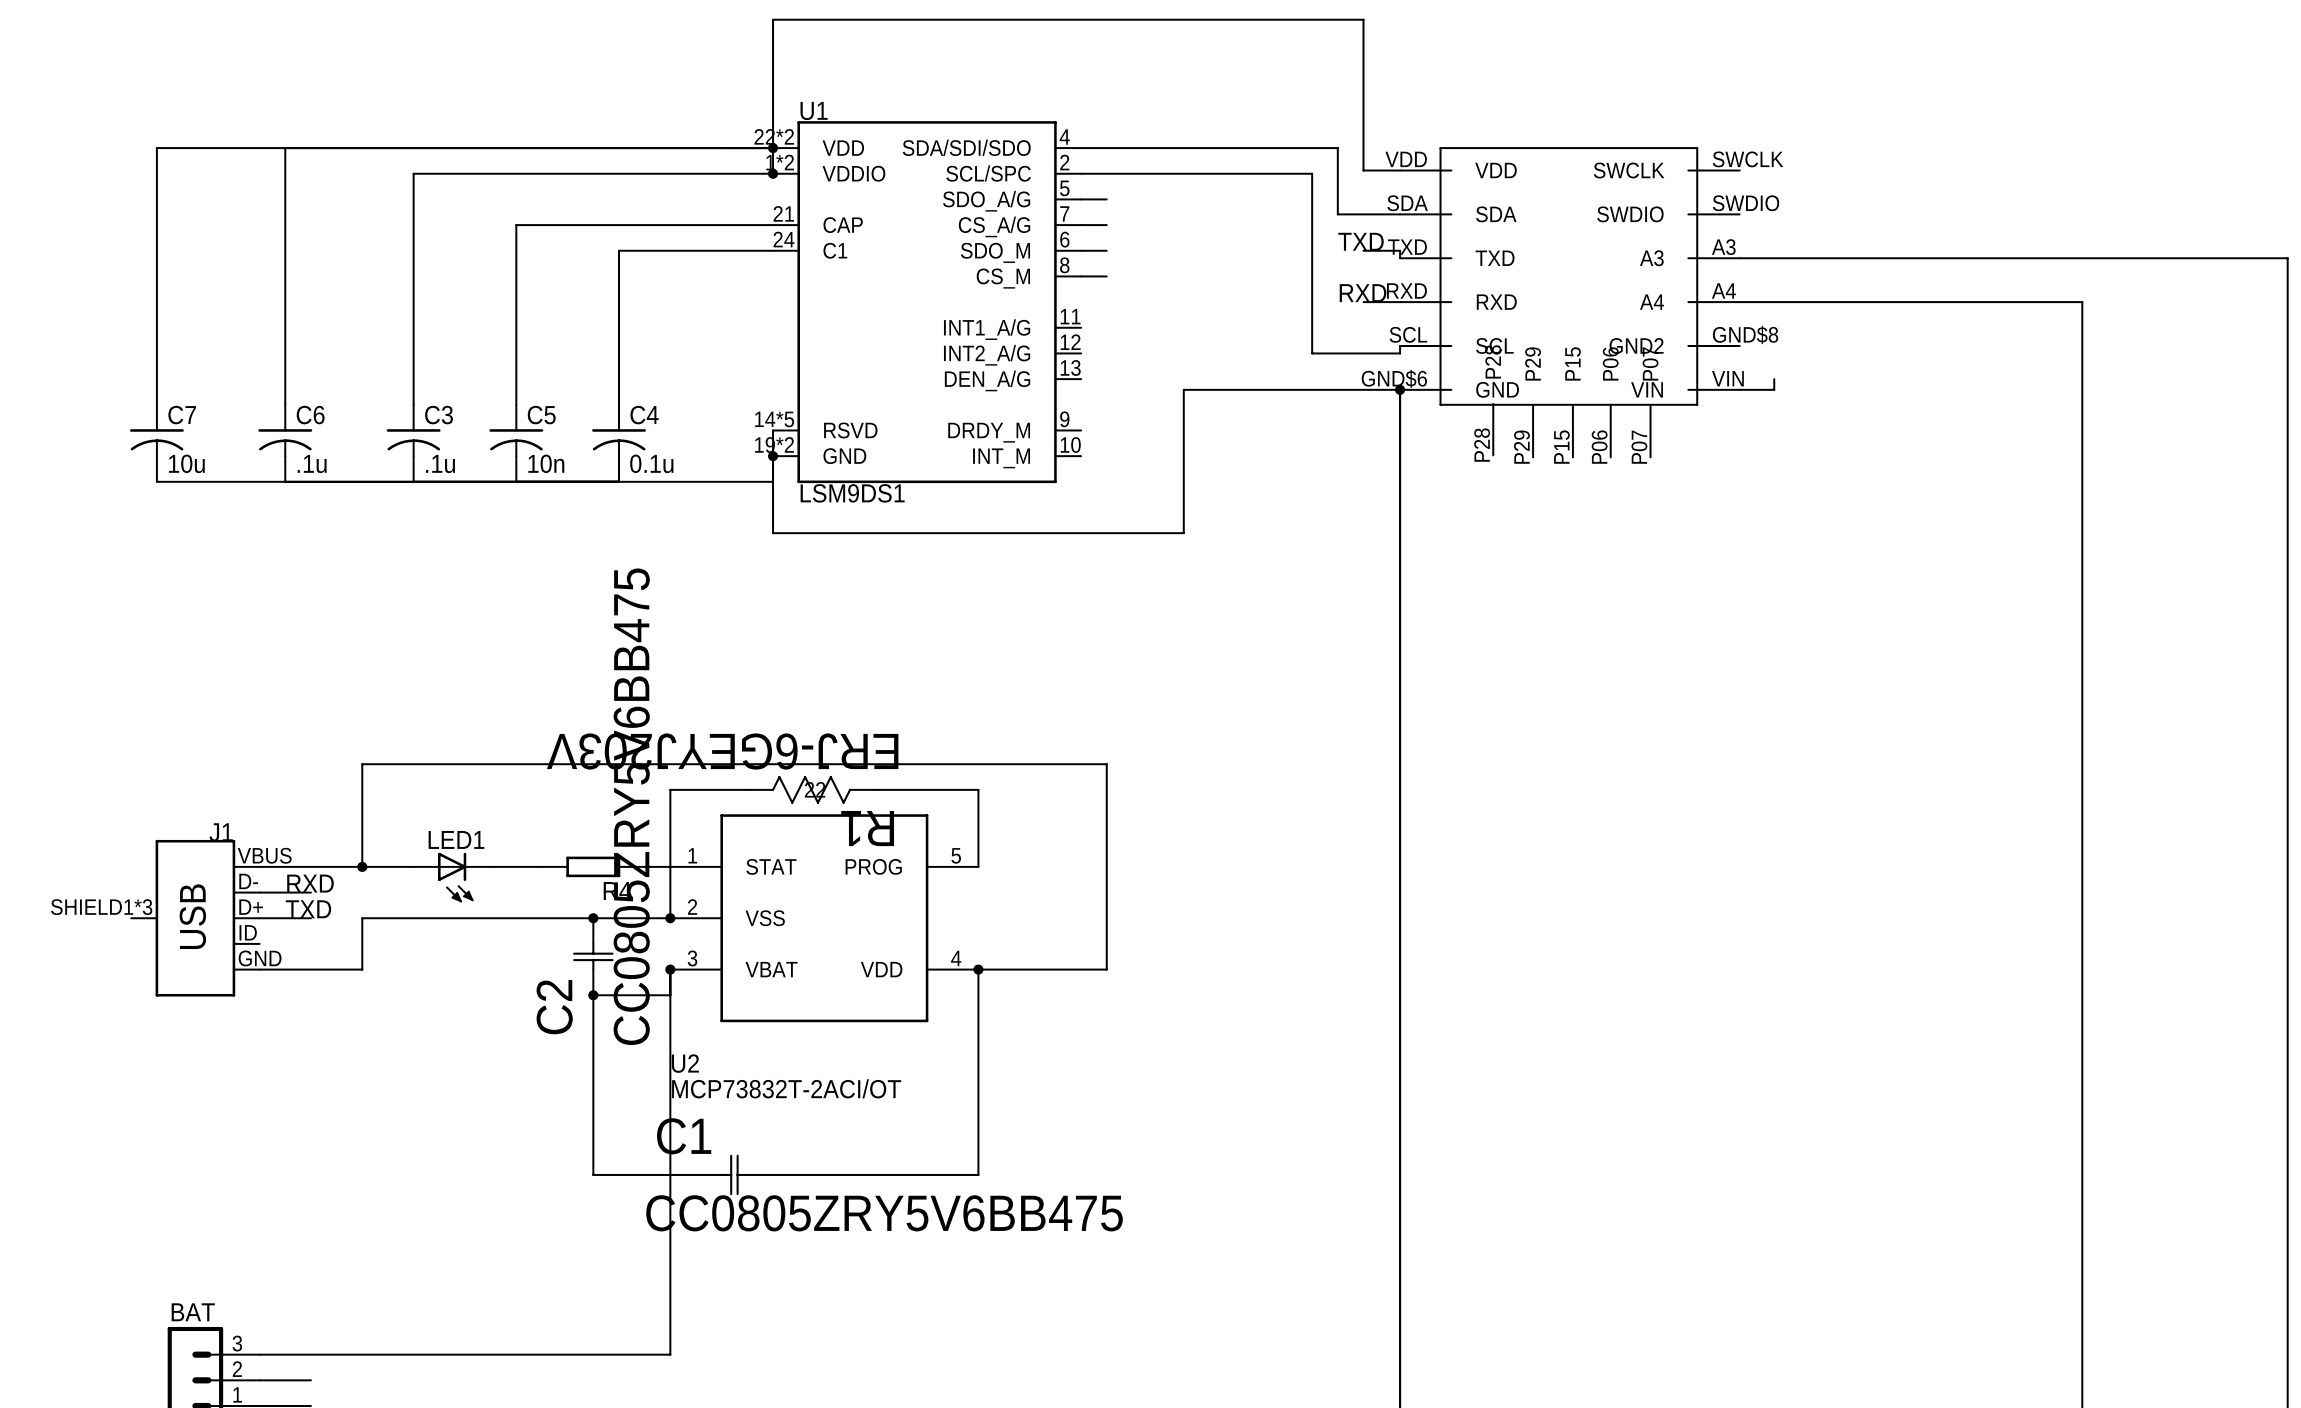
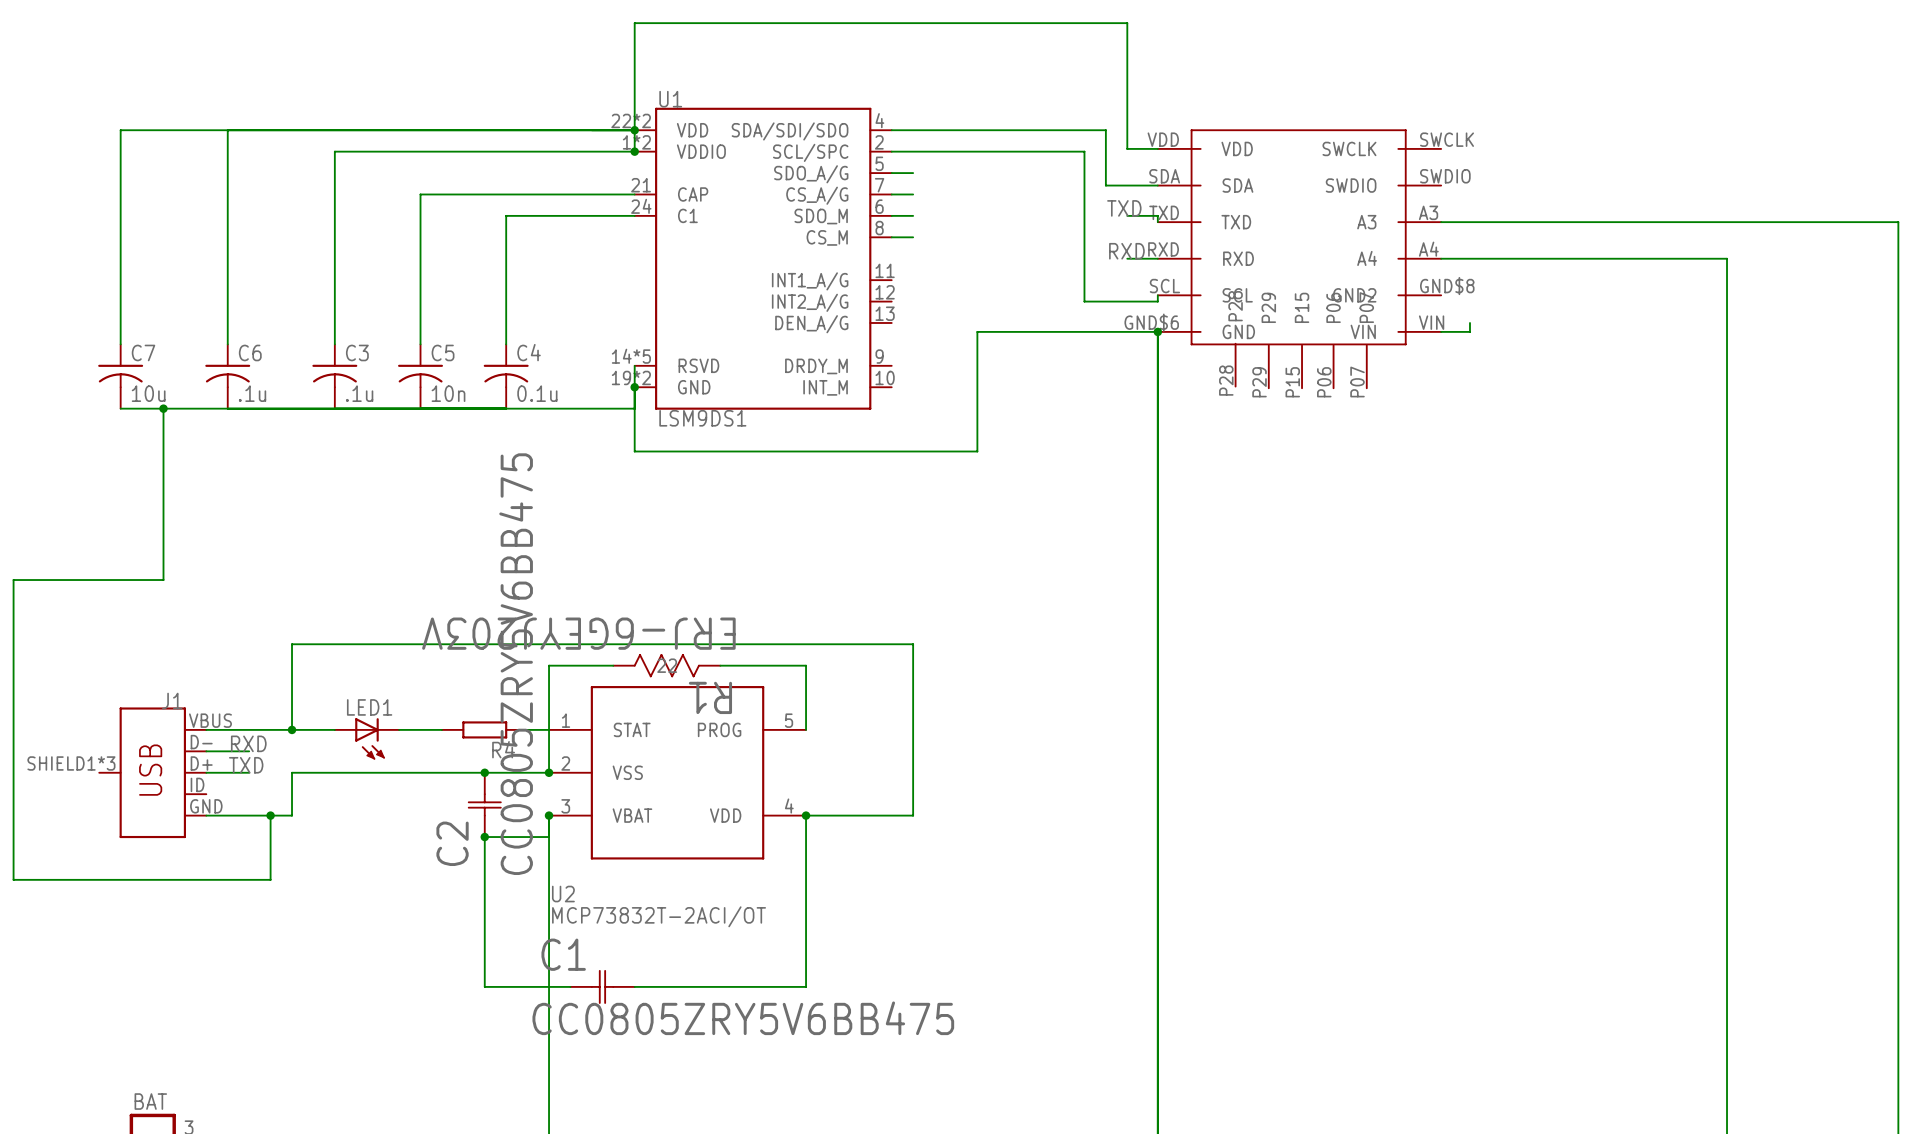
wire: none -> (163, 408) (163, 580) (13, 580) (13, 879) (270, 879) (270, 815)
junction: none -> (163, 408)
junction: none -> (270, 815)

